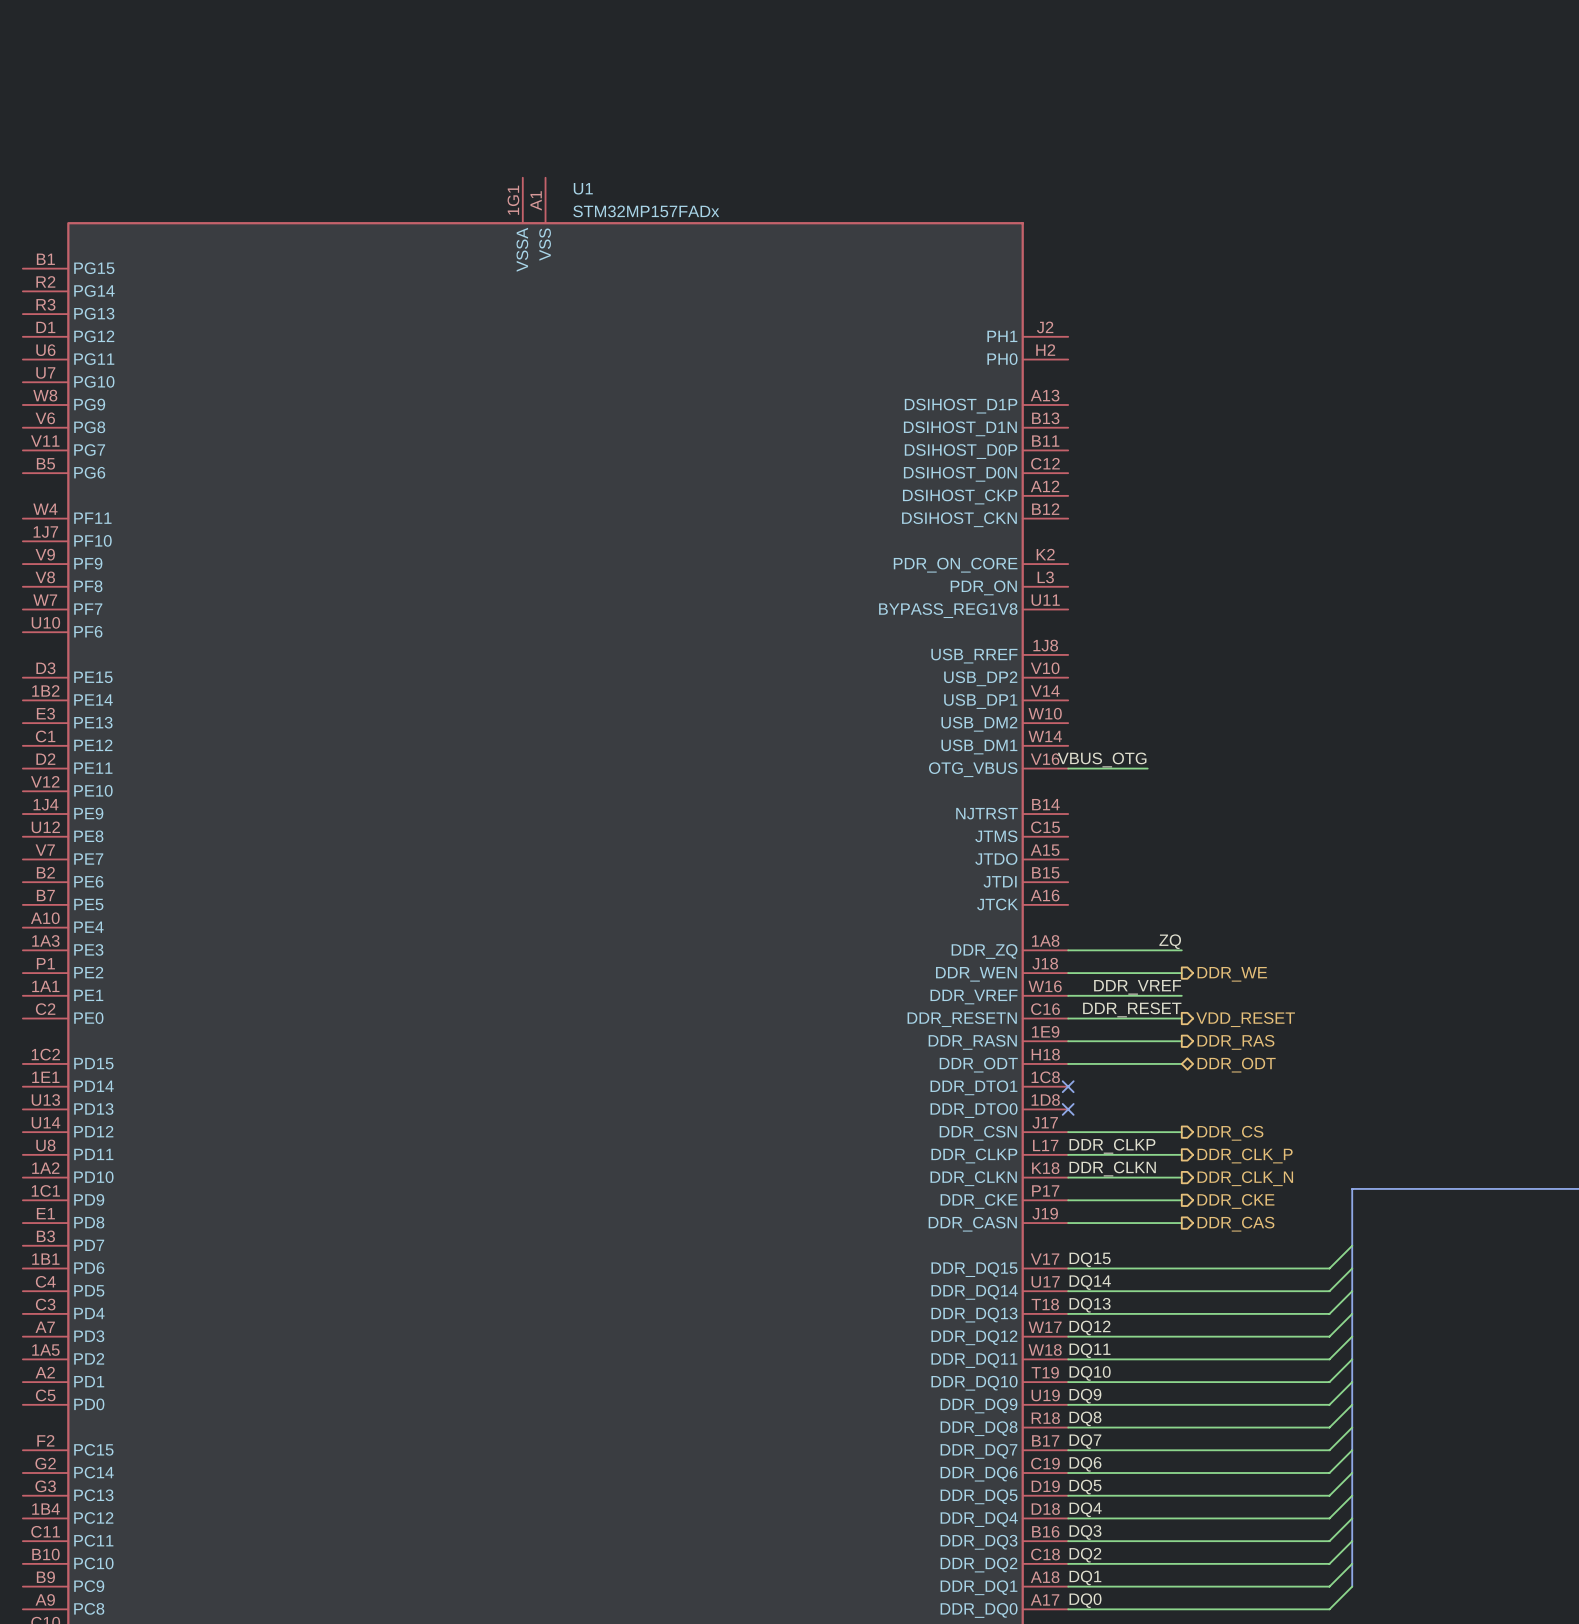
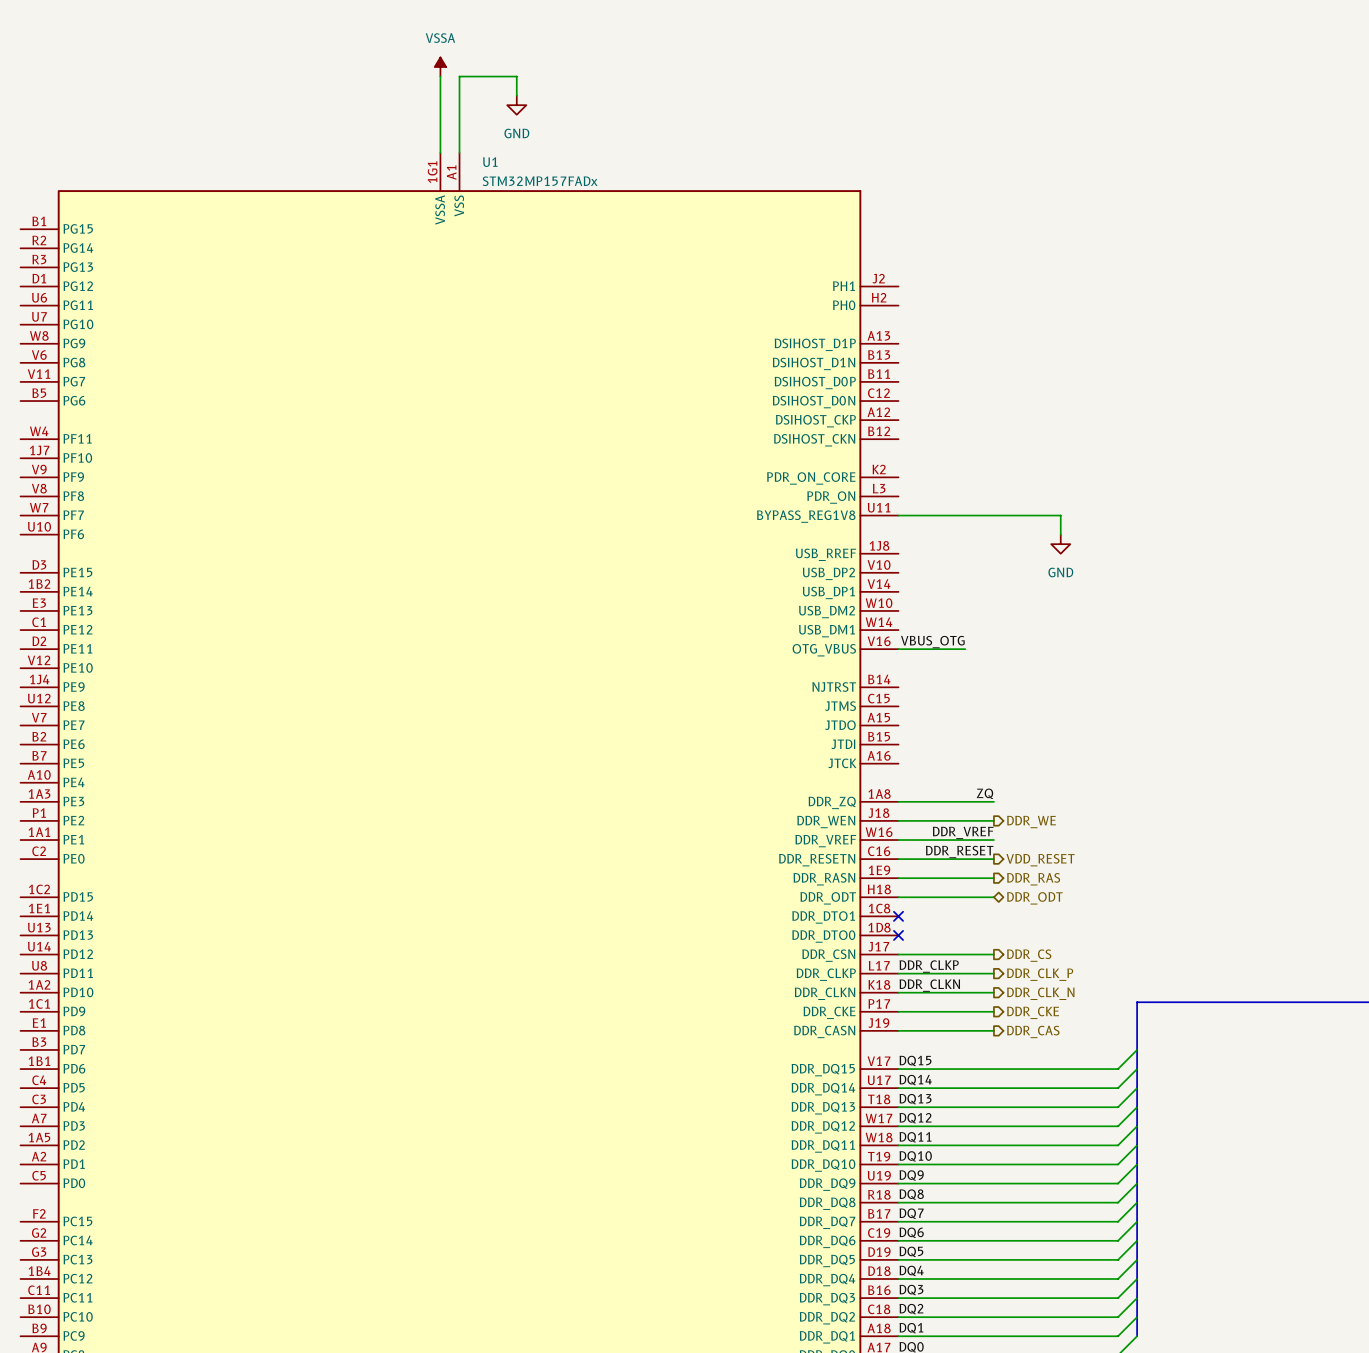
power symbol: none -> VSSA (440, 67)
wire: none -> (440, 76) (440, 152)
wire: none -> (516, 95) (516, 76) (459, 76) (459, 152)
power symbol: none -> GND (516, 105)
wire: none -> (898, 515) (1060, 515) (1060, 534)
power symbol: none -> GND (1060, 544)

